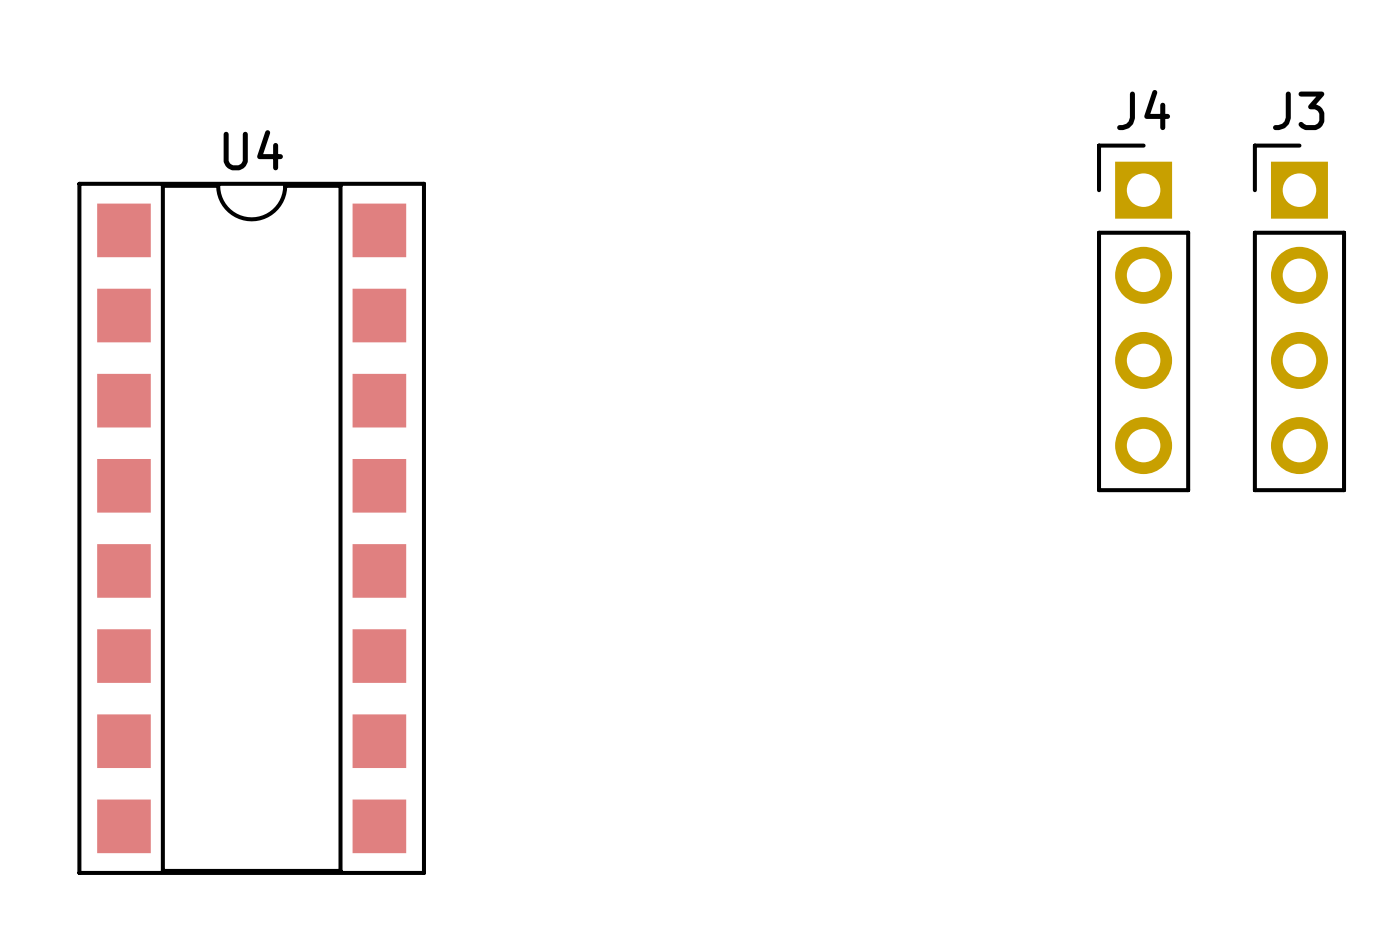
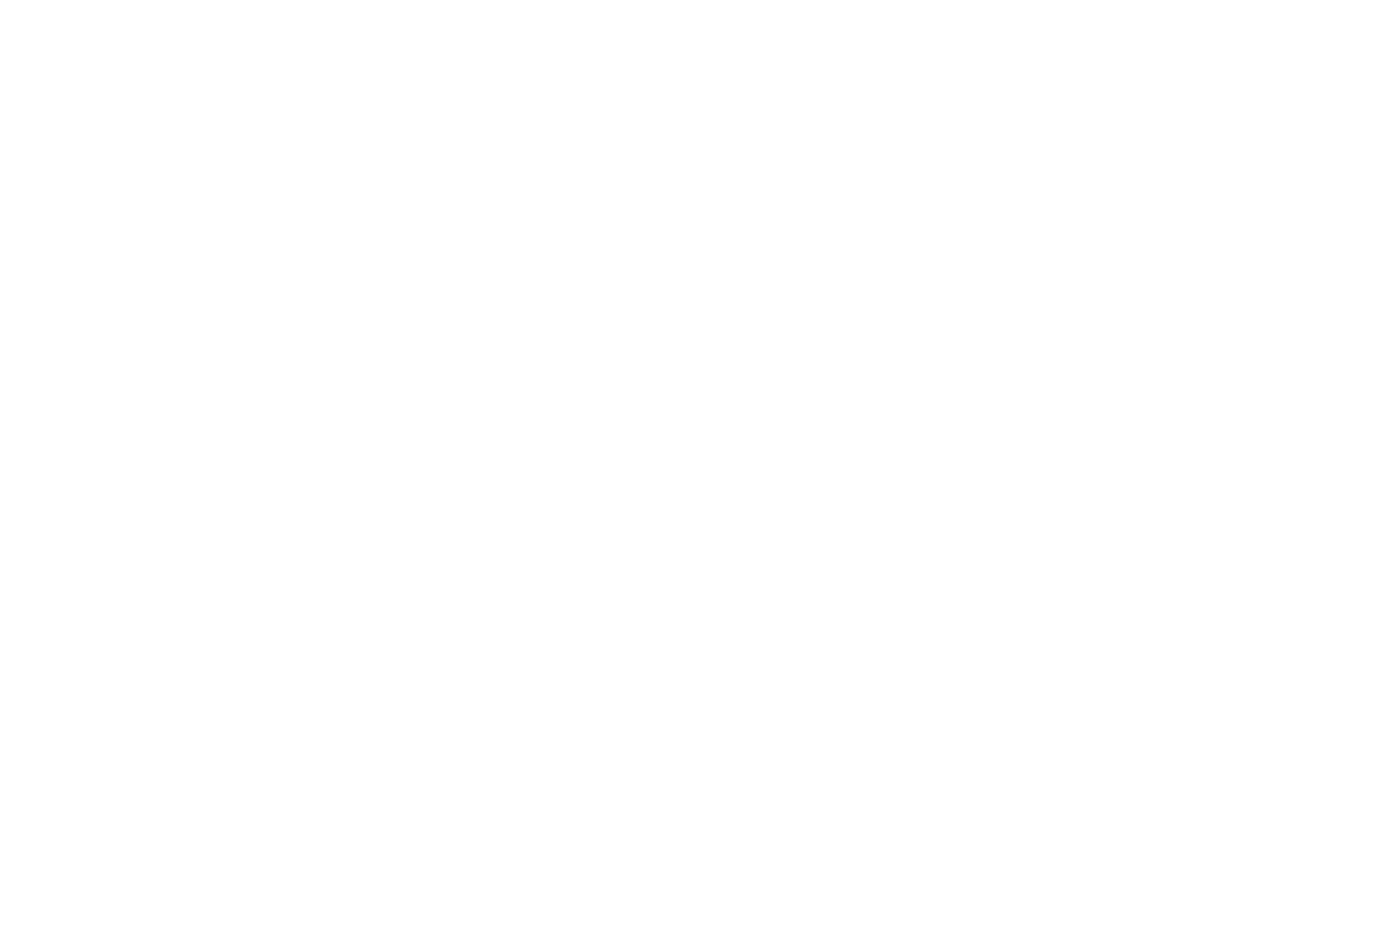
J4: (1143, 317) -> none
J3: (1299, 317) -> none
U4: (251, 528) -> none

